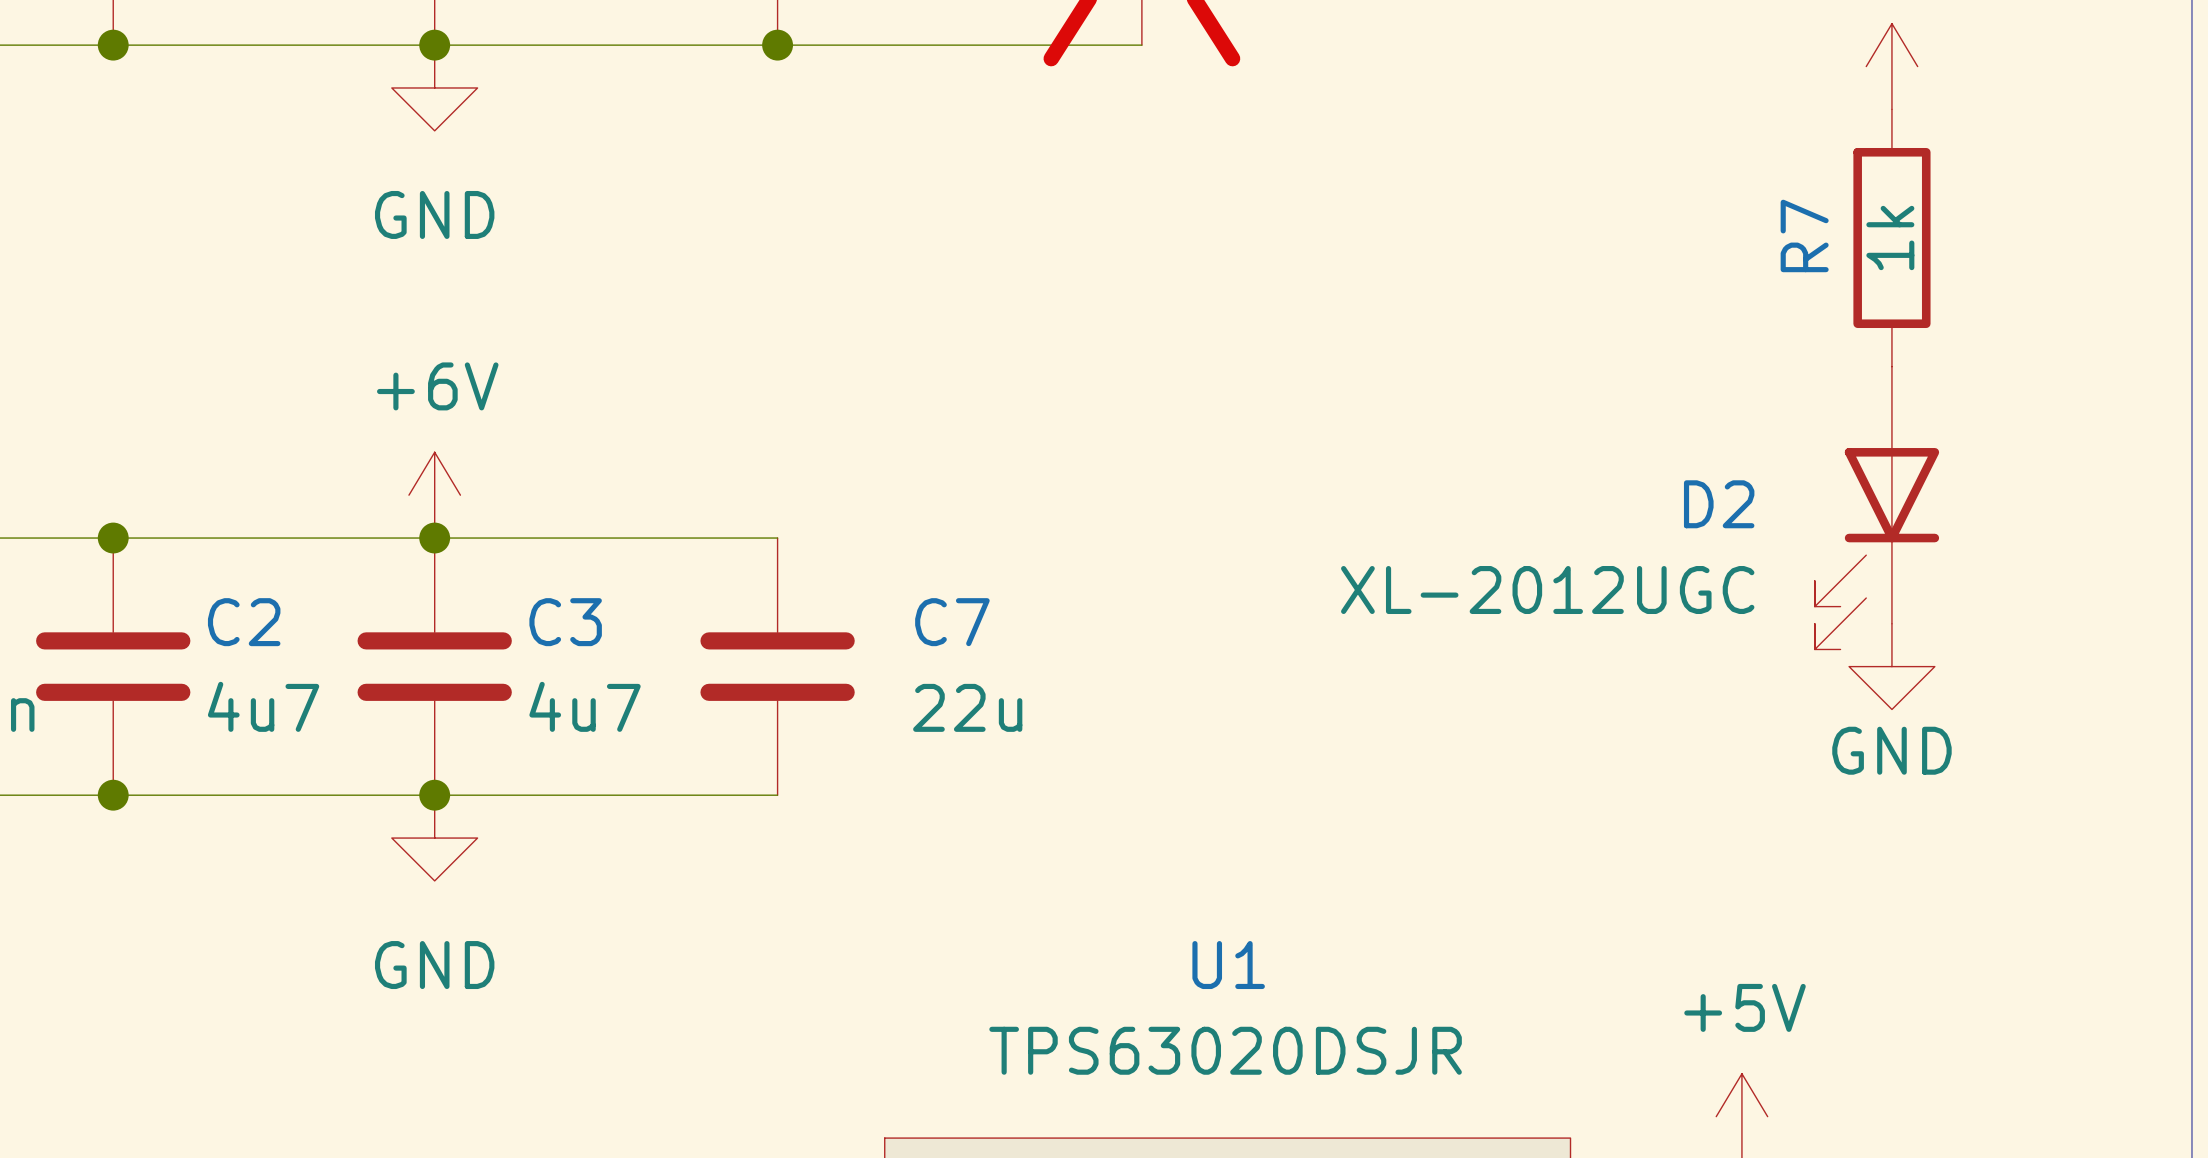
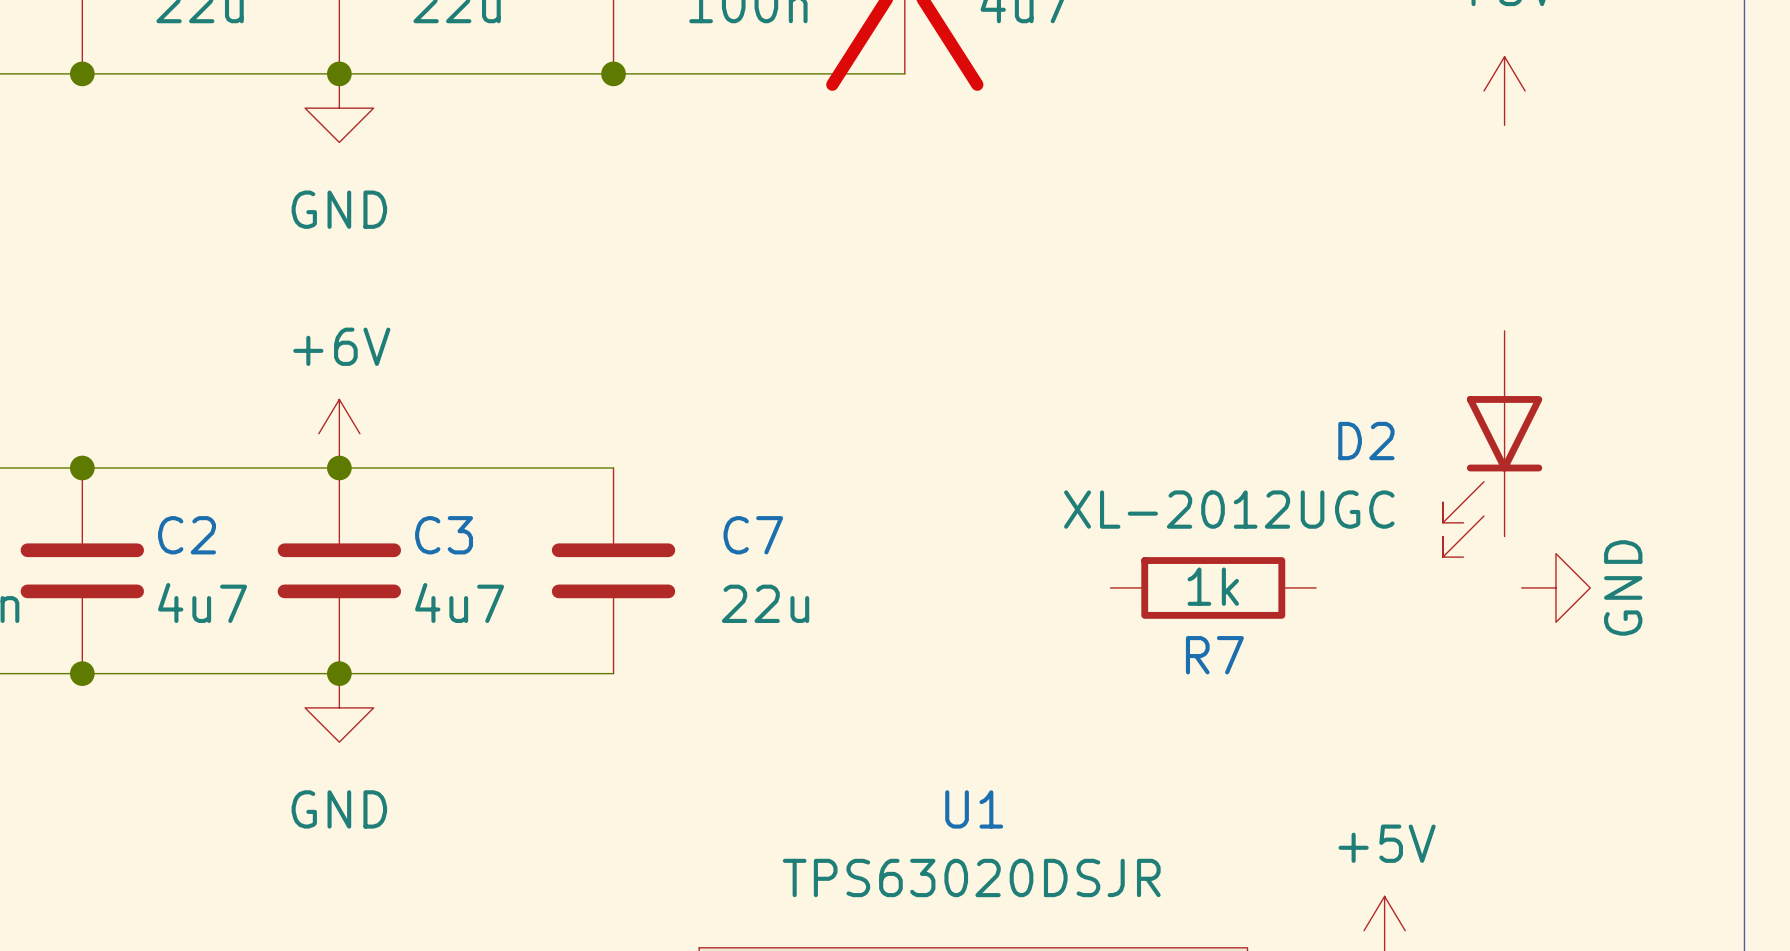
R7 name position: R7 (1804, 235) -> R7 (1214, 655)
R7 rotation: 0° (1891, 238) -> 90° clockwise (1213, 587)
R7 position: (1891, 238) -> (1213, 587)
power symbol rotation: 0° (1891, 666) -> 90° counterclockwise (1555, 587)
power symbol position: GND (1891, 666) -> GND (1555, 587)

